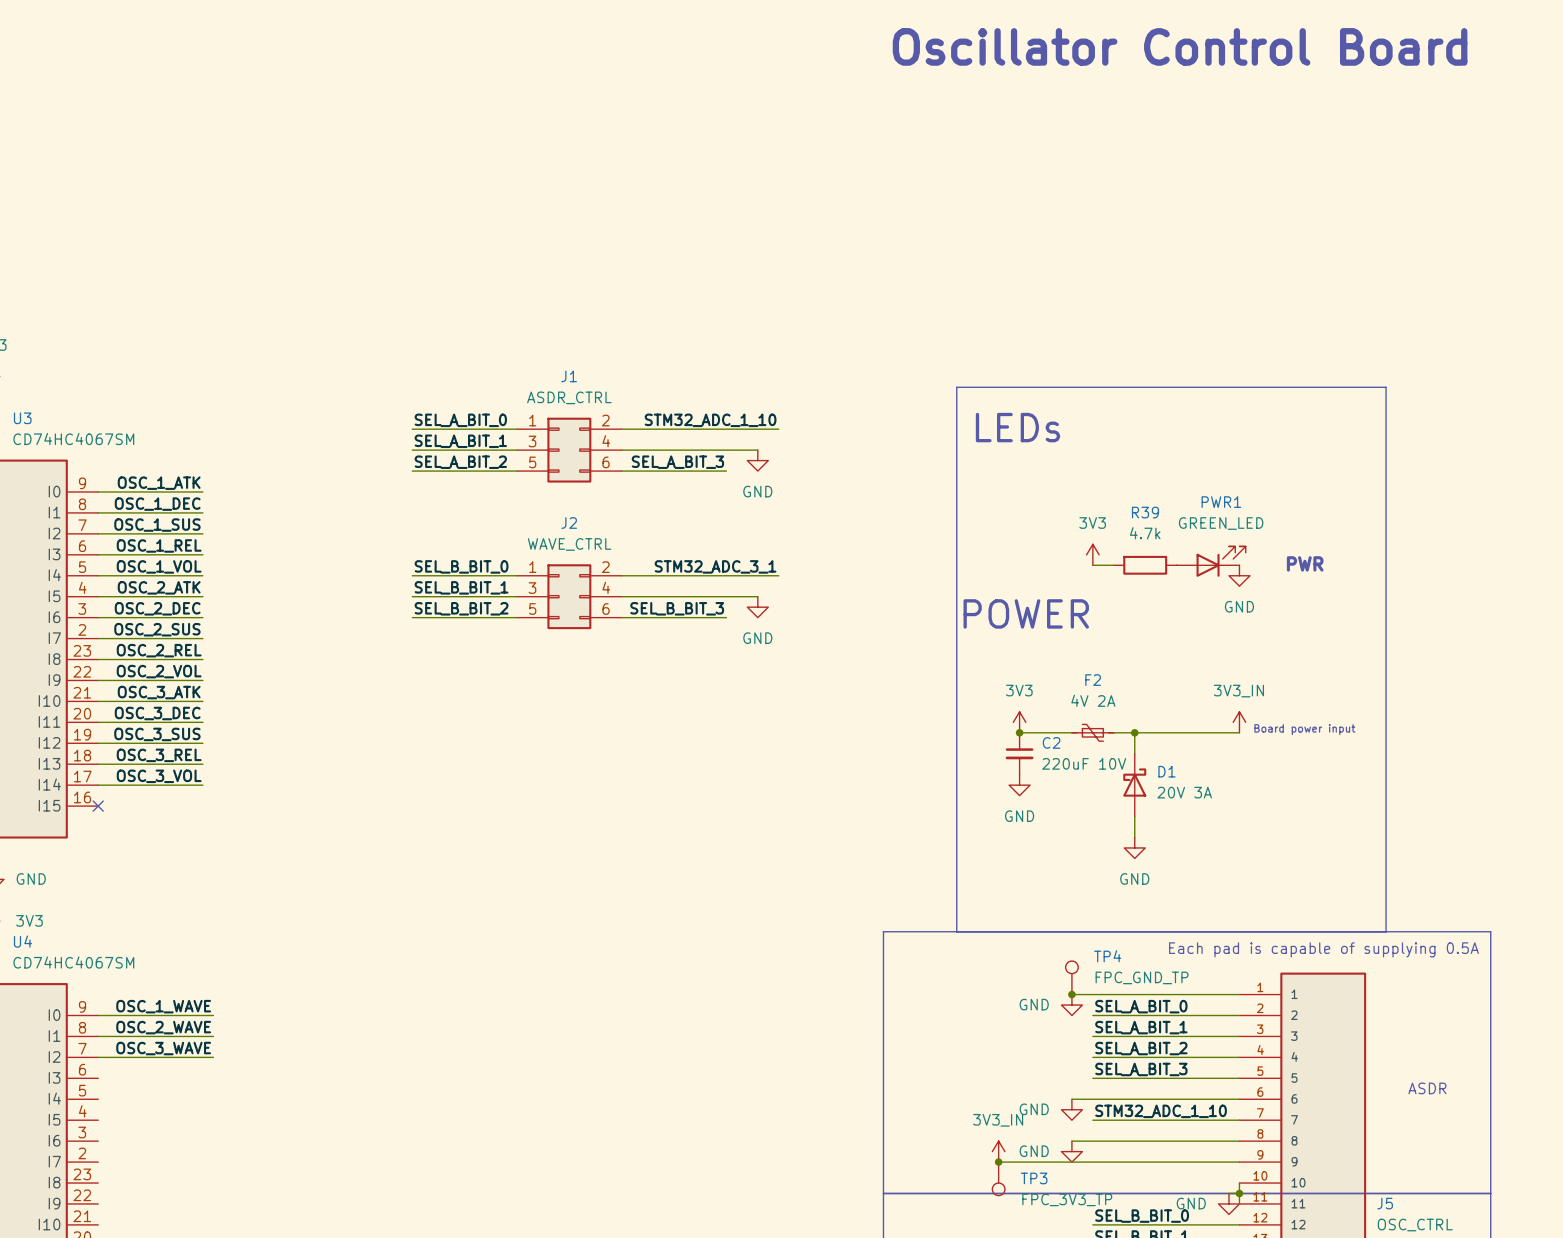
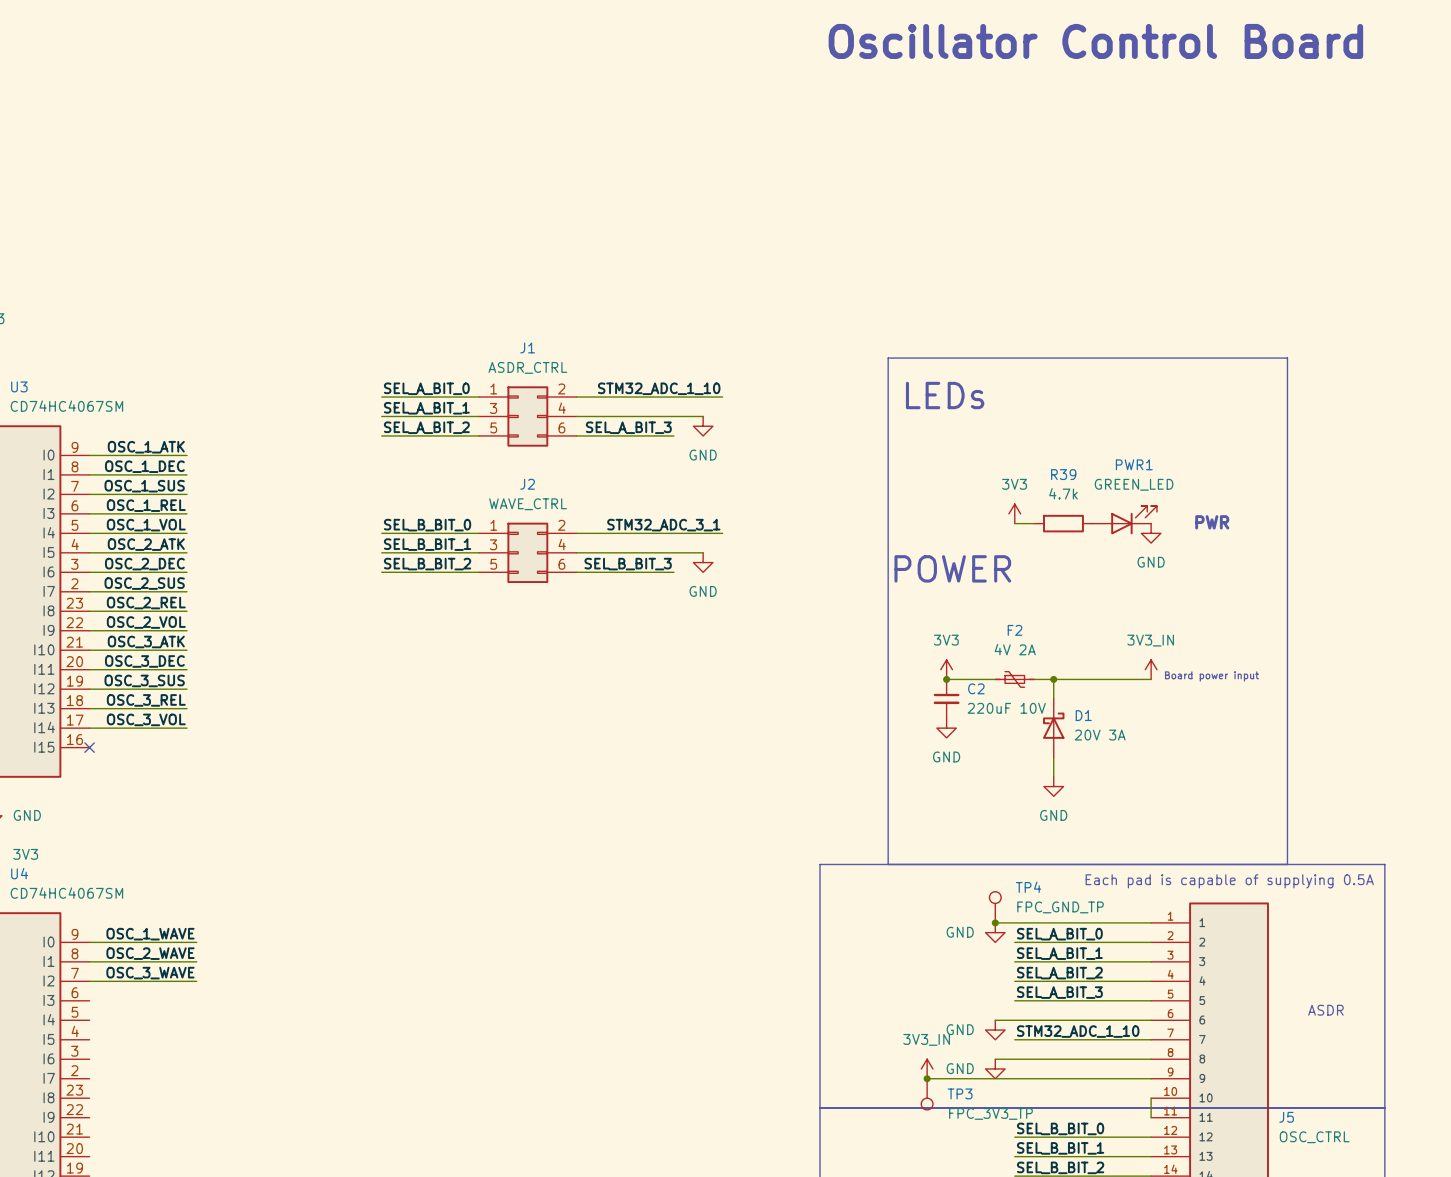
junction: (1239, 1193) -> none
power symbol: GND (1228, 1203) -> none

